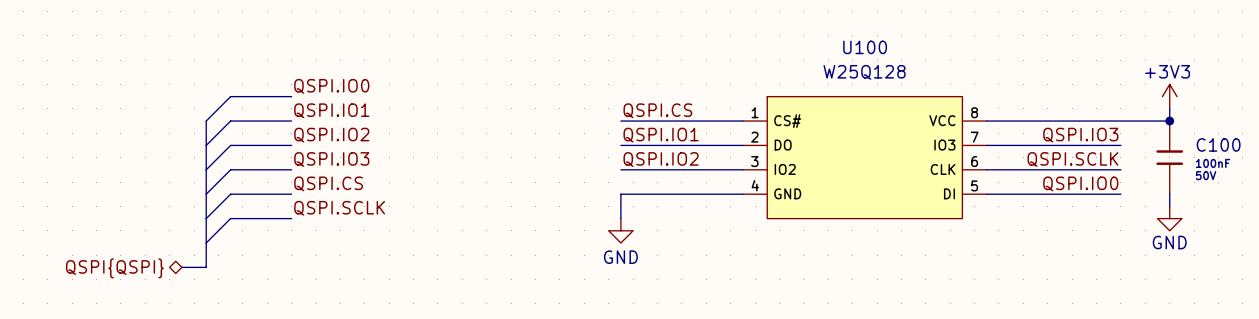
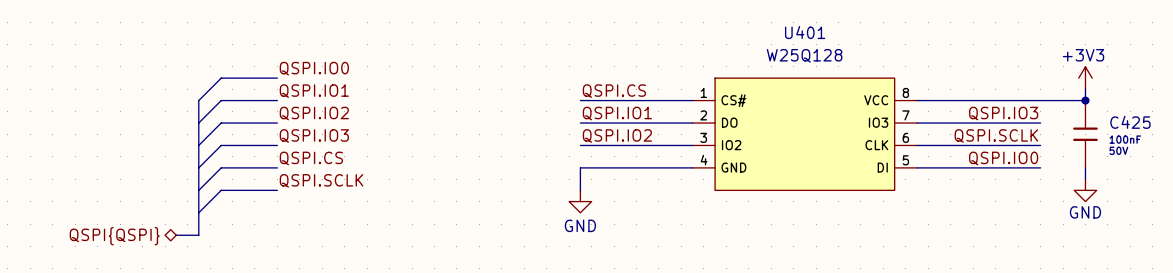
U100 name: U100 (865, 47) -> U401 (805, 32)
C100 name: C100 (1218, 144) -> C425 (1130, 122)

